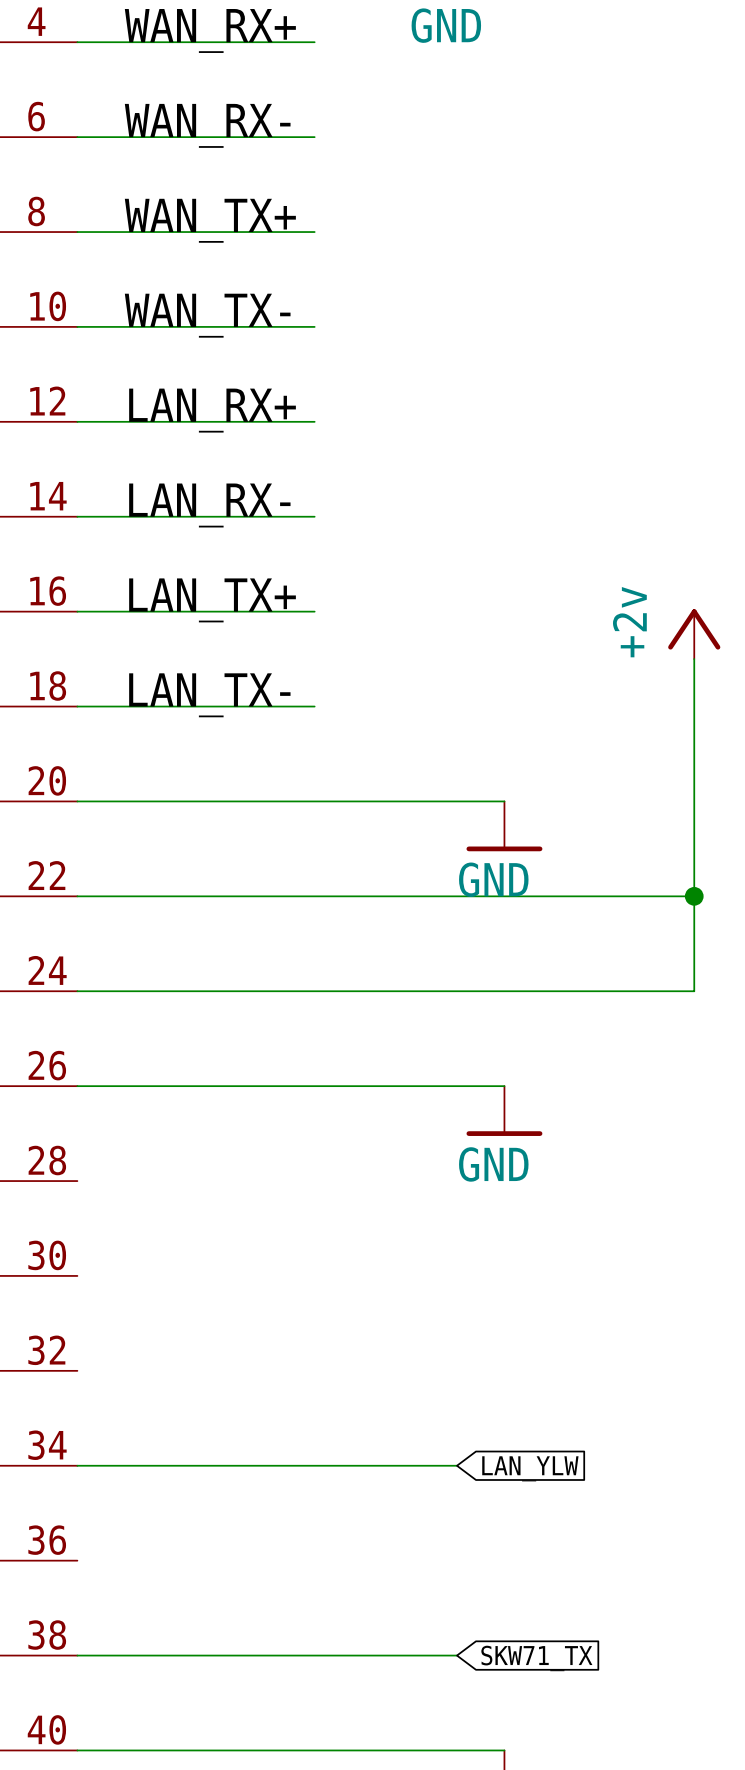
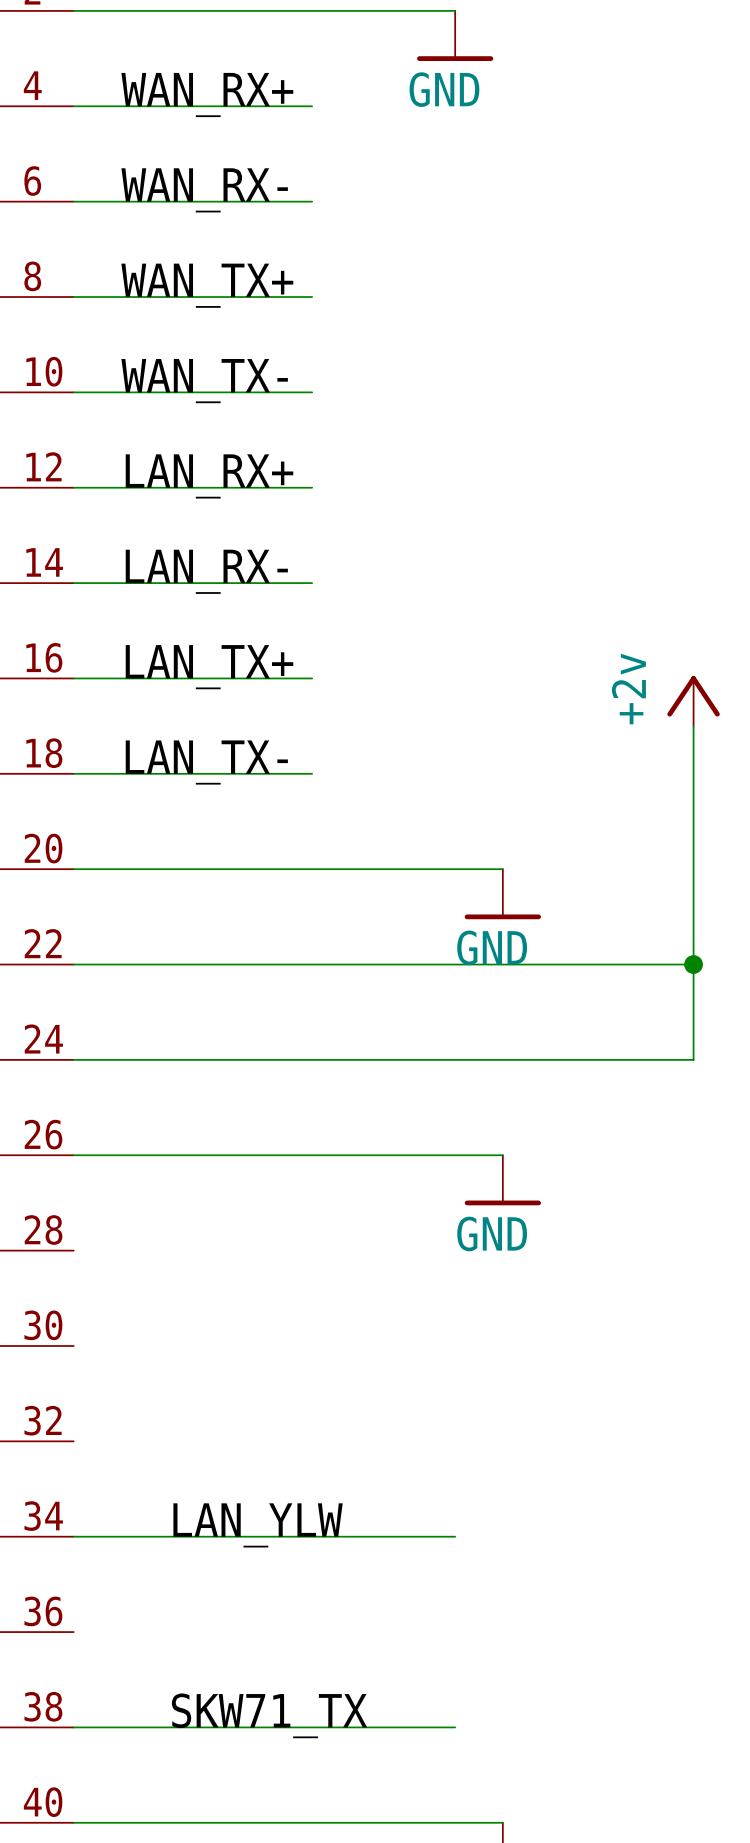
label: none -> LAN_YLW (258, 1525)
global label: LAN_YLW (530, 1468) -> none
label: none -> SKW71_TX (269, 1715)
global label: SKW71_TX (536, 1658) -> none

